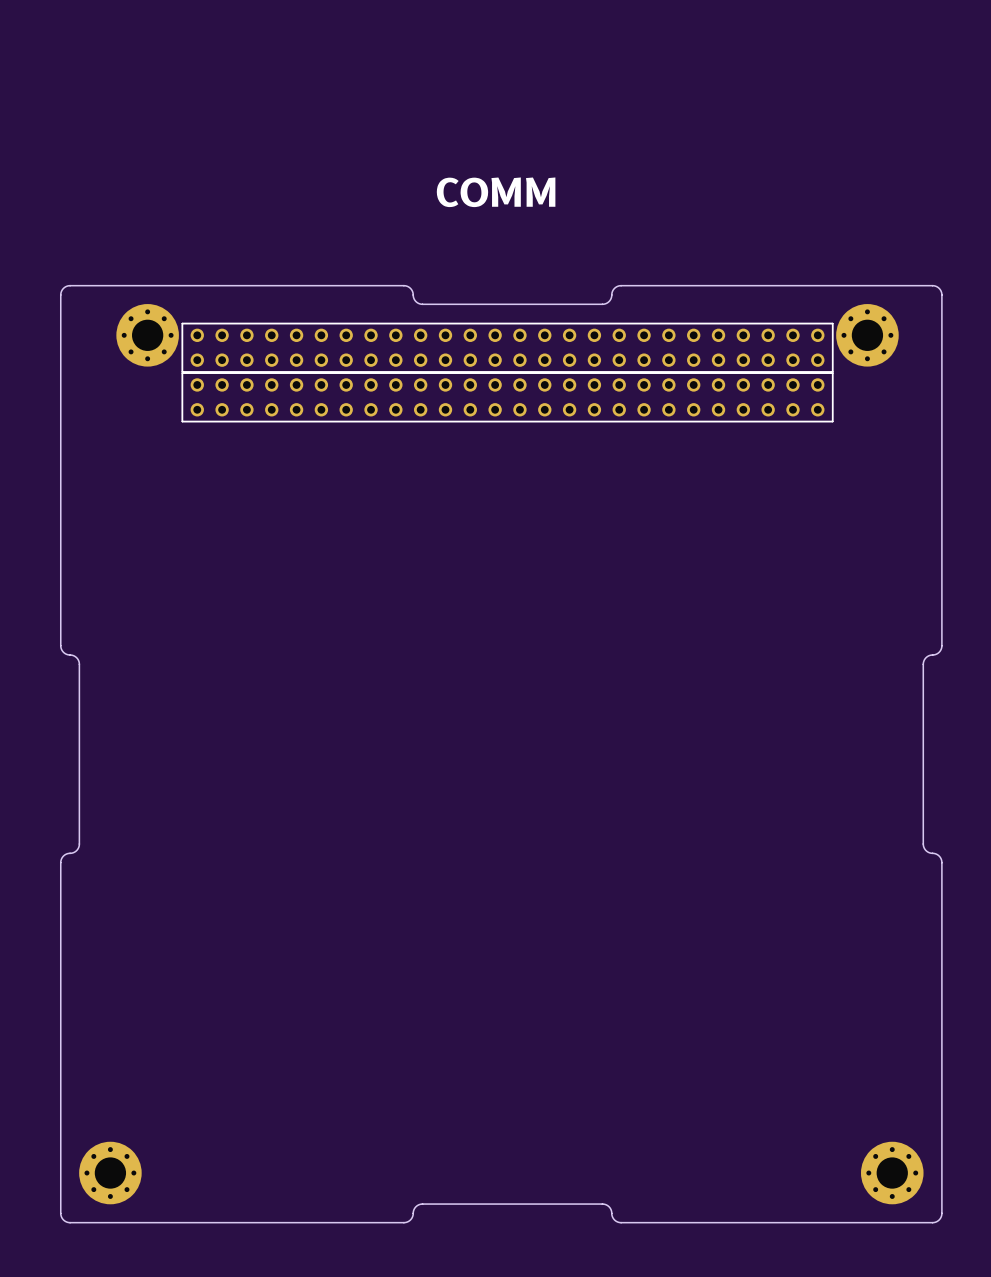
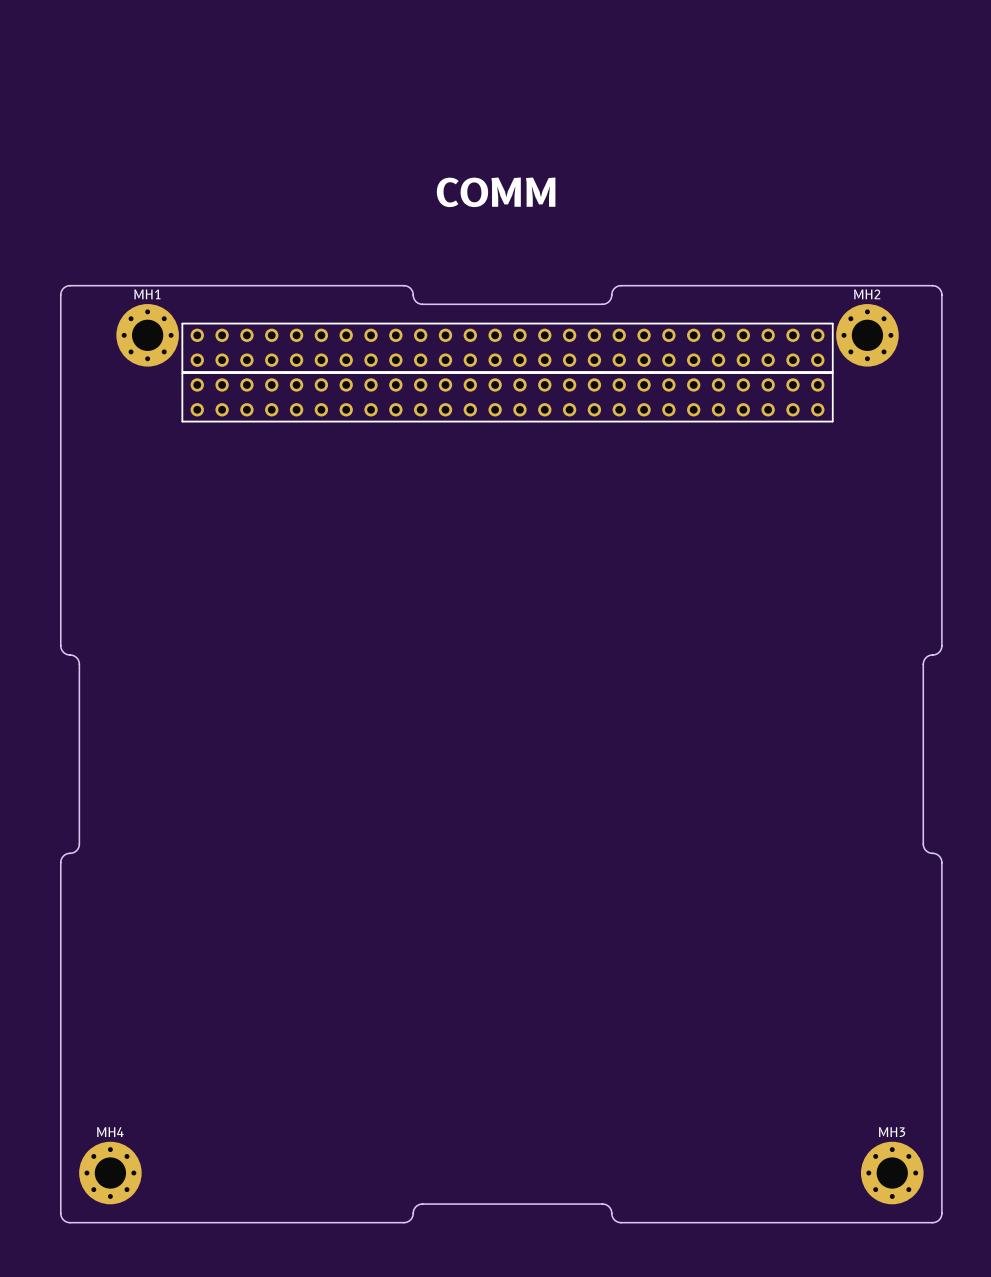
MH1 name: none -> MH1 (147, 294)
MH2 name: none -> MH2 (867, 294)
MH4 name: none -> MH4 (110, 1132)
MH3 name: none -> MH3 (892, 1132)

